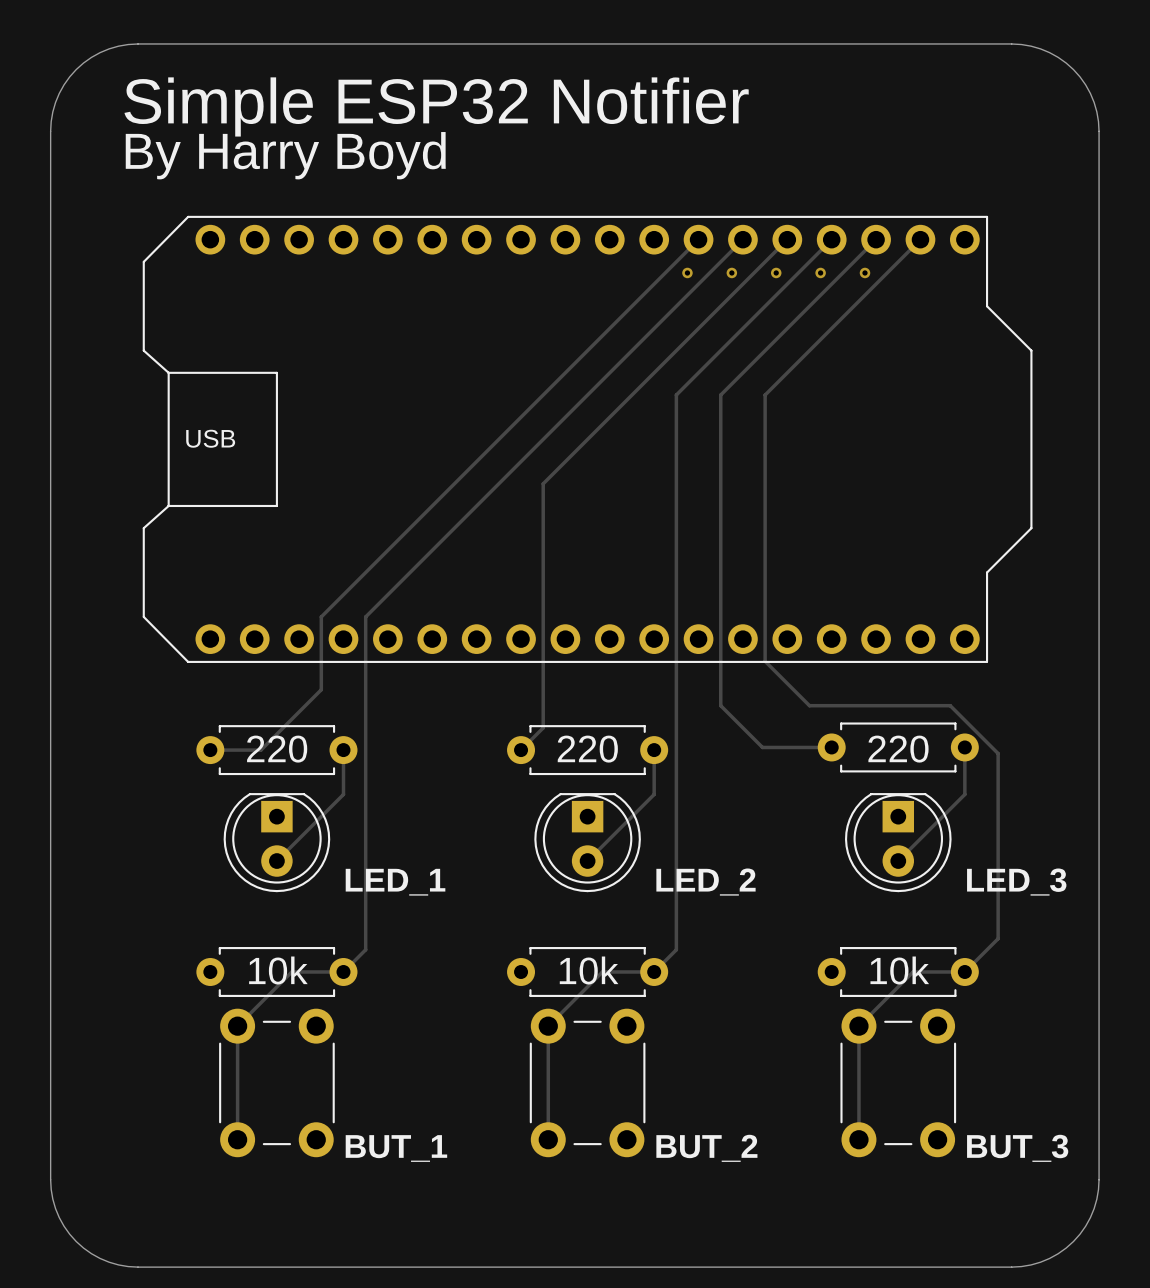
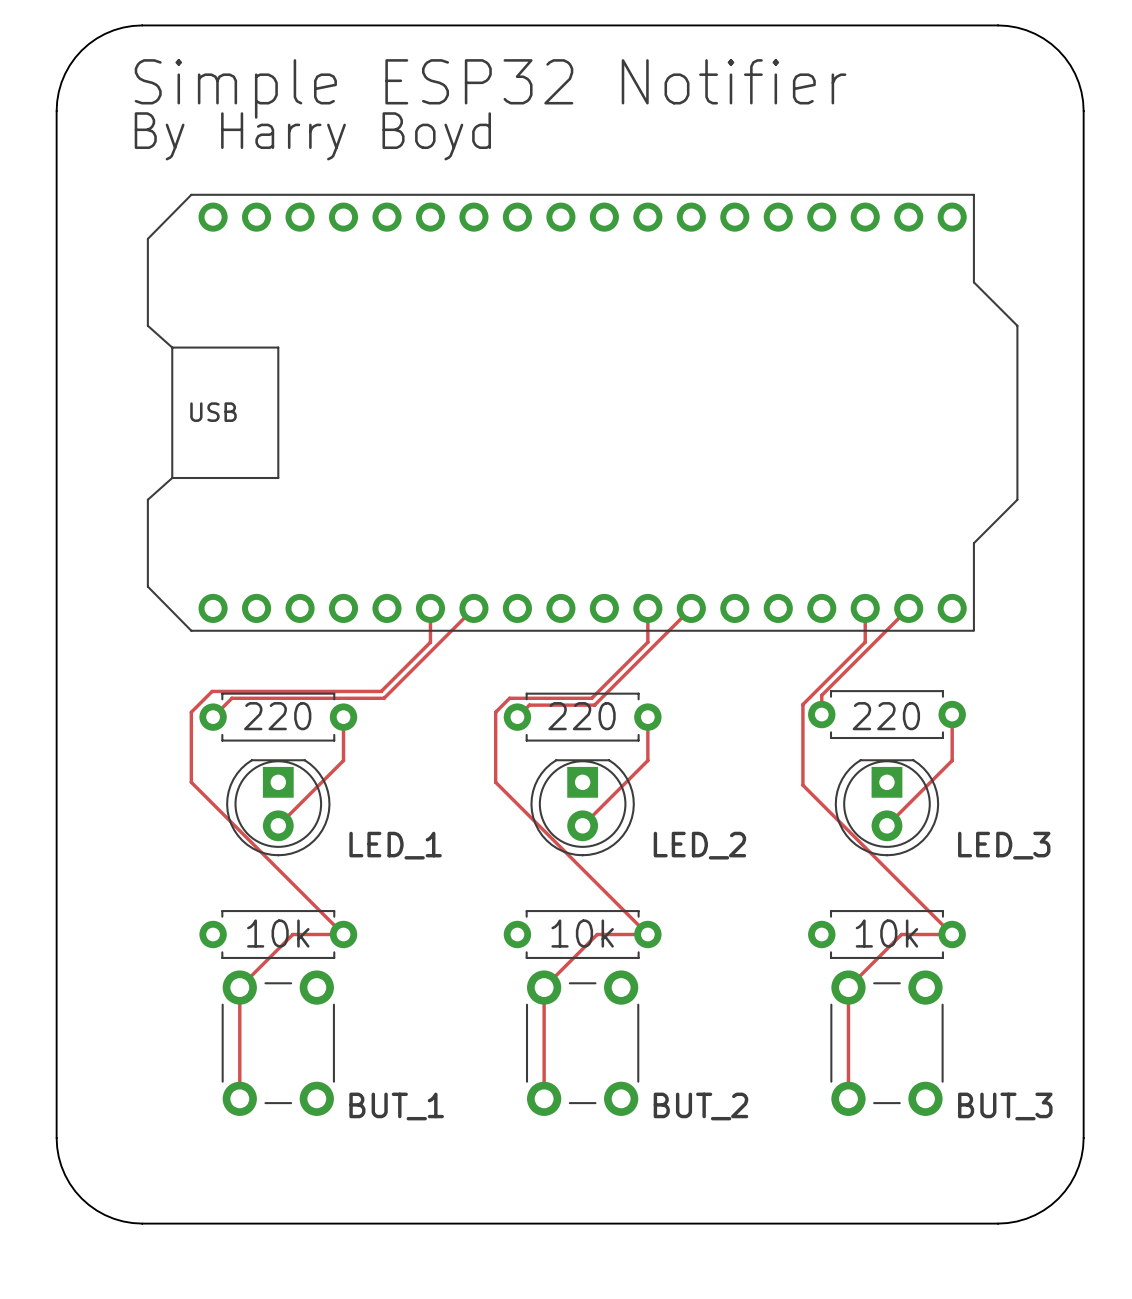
track: (698, 239) (321, 616) (321, 689) (260, 750) (210, 750) -> (473, 608) (384, 698) (231, 698) (213, 717)
track: (742, 239) (365, 616) (365, 949) (343, 971) -> (430, 608) (430, 642) (381, 691) (212, 691) (191, 712) (191, 782) (343, 934)
track: (787, 239) (543, 483) (543, 727) (533, 737) -> (691, 608) (594, 705) (529, 705)
track: (831, 239) (676, 395) (676, 949) (654, 971) -> (647, 608) (647, 642) (591, 698) (509, 698) (495, 712) (495, 782) (647, 934)
track: (876, 239) (720, 395) (720, 705) (762, 747) (831, 747) -> (908, 608) (821, 695) (821, 714)
track: (920, 239) (765, 395) (765, 661) (809, 705) (950, 705) (998, 753) (998, 938) (964, 971) -> (865, 608) (865, 642) (802, 704) (802, 785) (952, 934)
via: (687, 272) -> none
via: (731, 272) -> none
via: (776, 272) -> none
via: (820, 272) -> none
via: (864, 272) -> none

